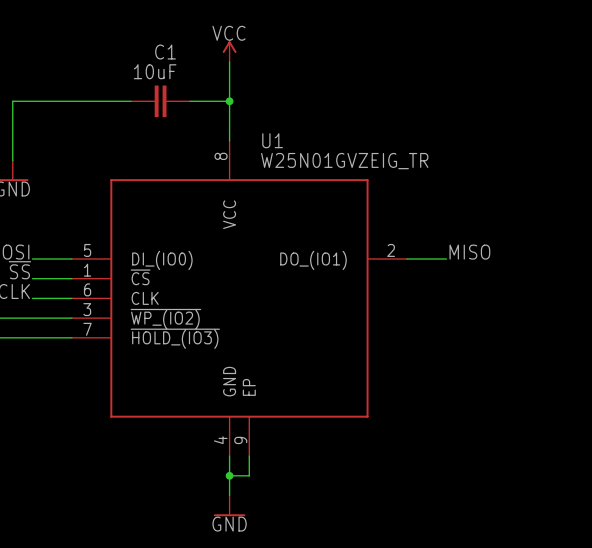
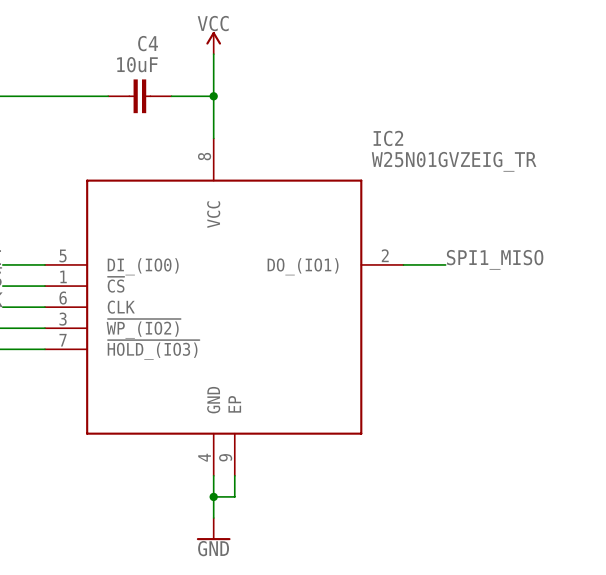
C1 name: C1 (165, 52) -> C4 (148, 43)
U1 name: U1 (272, 140) -> IC2 (388, 138)
U1 value position: W25N01GVZEIG_TR (344, 161) -> W25N01GVZEIG_TR (454, 161)
label: MISO (469, 252) -> SPI1_MISO (495, 259)

